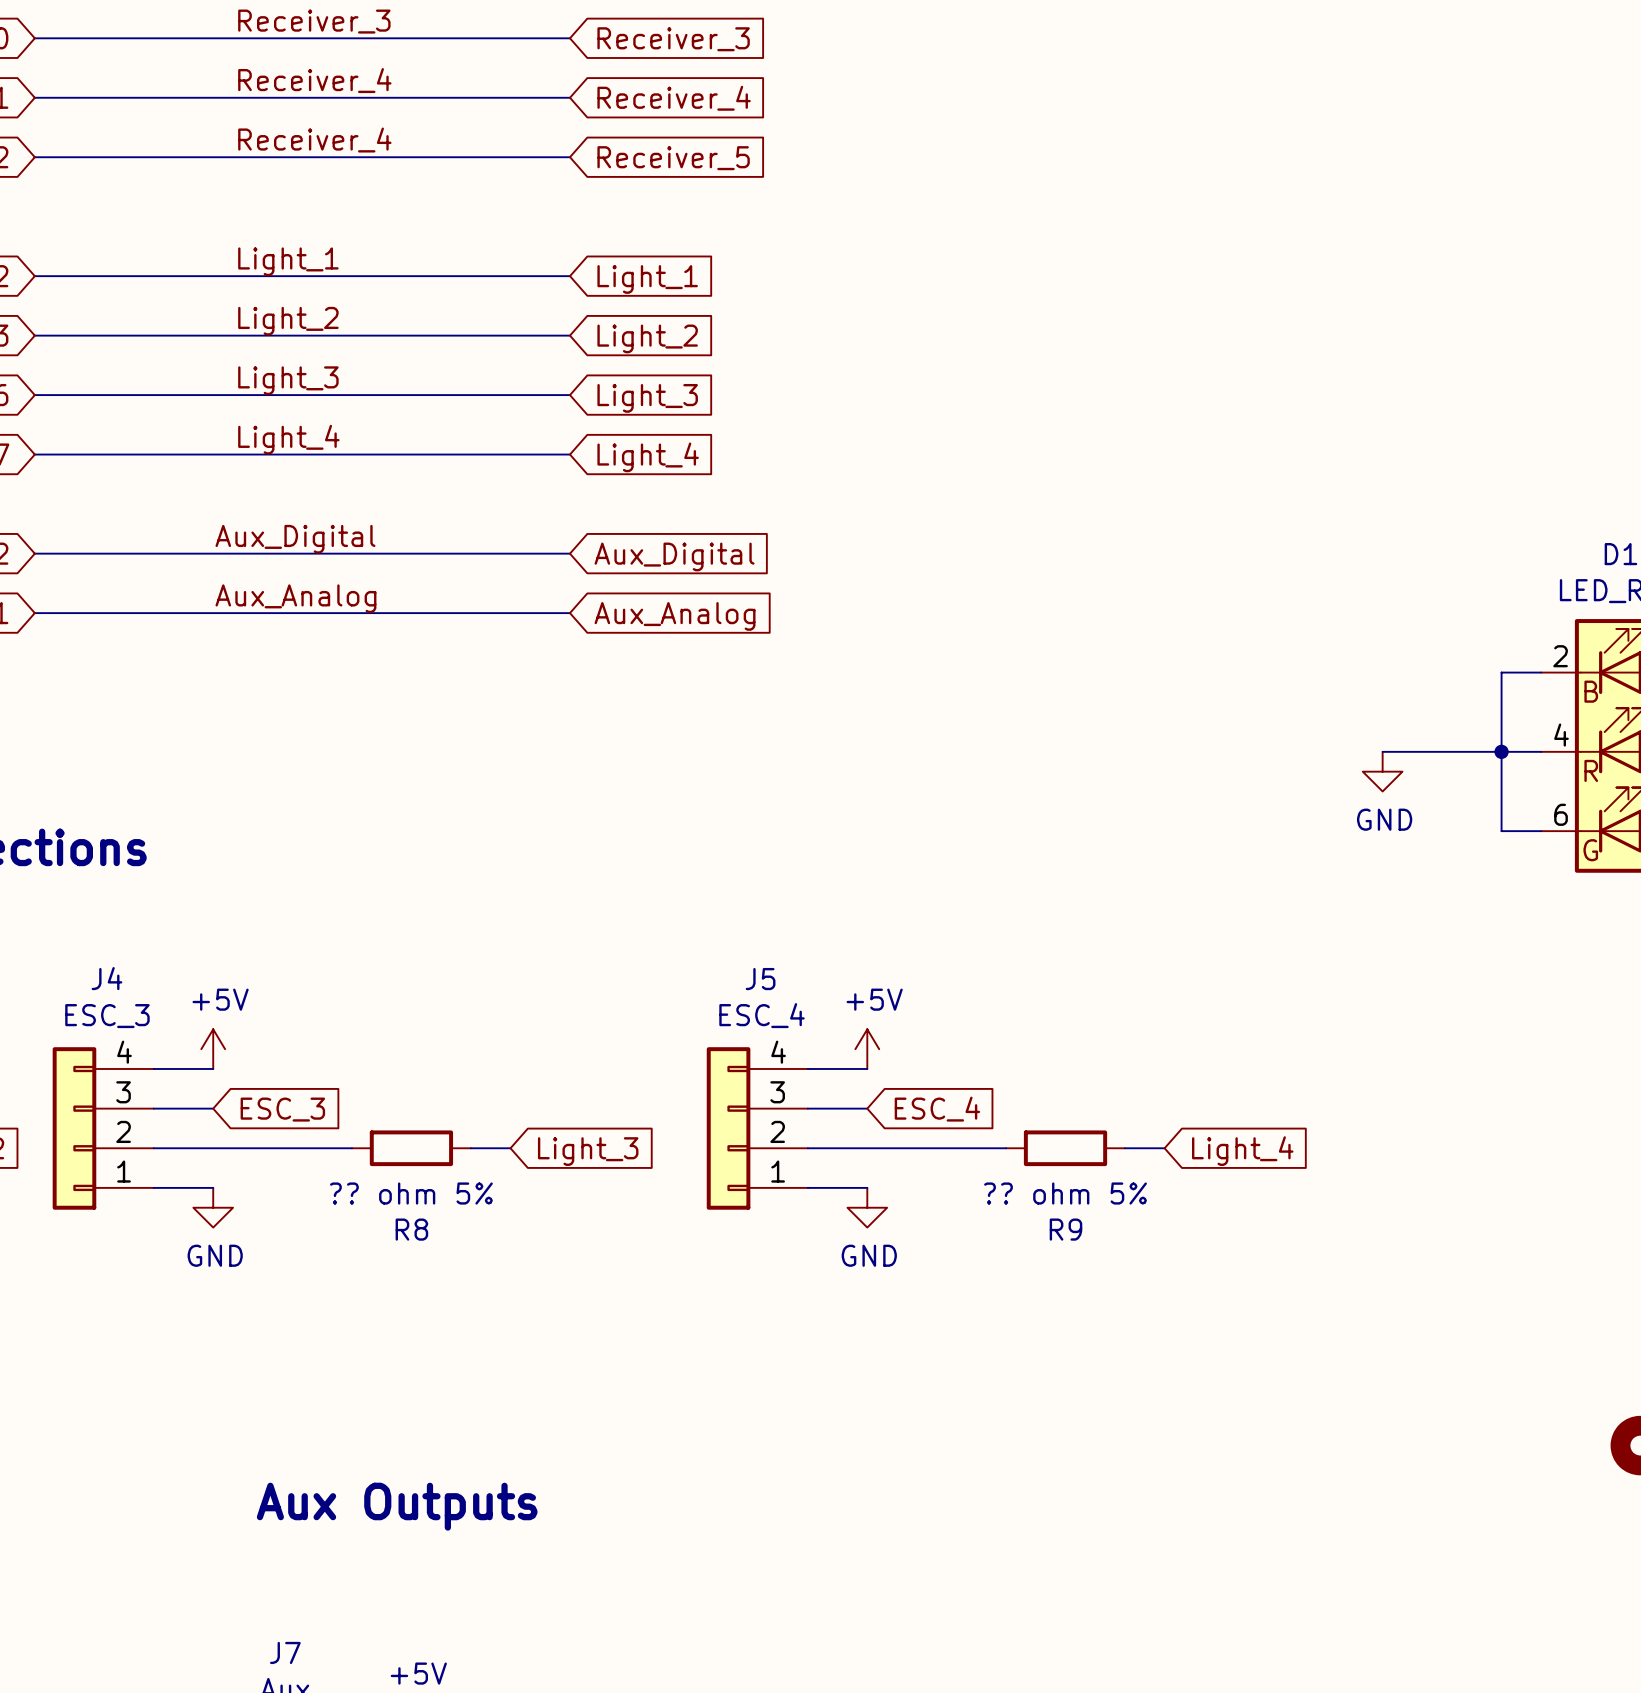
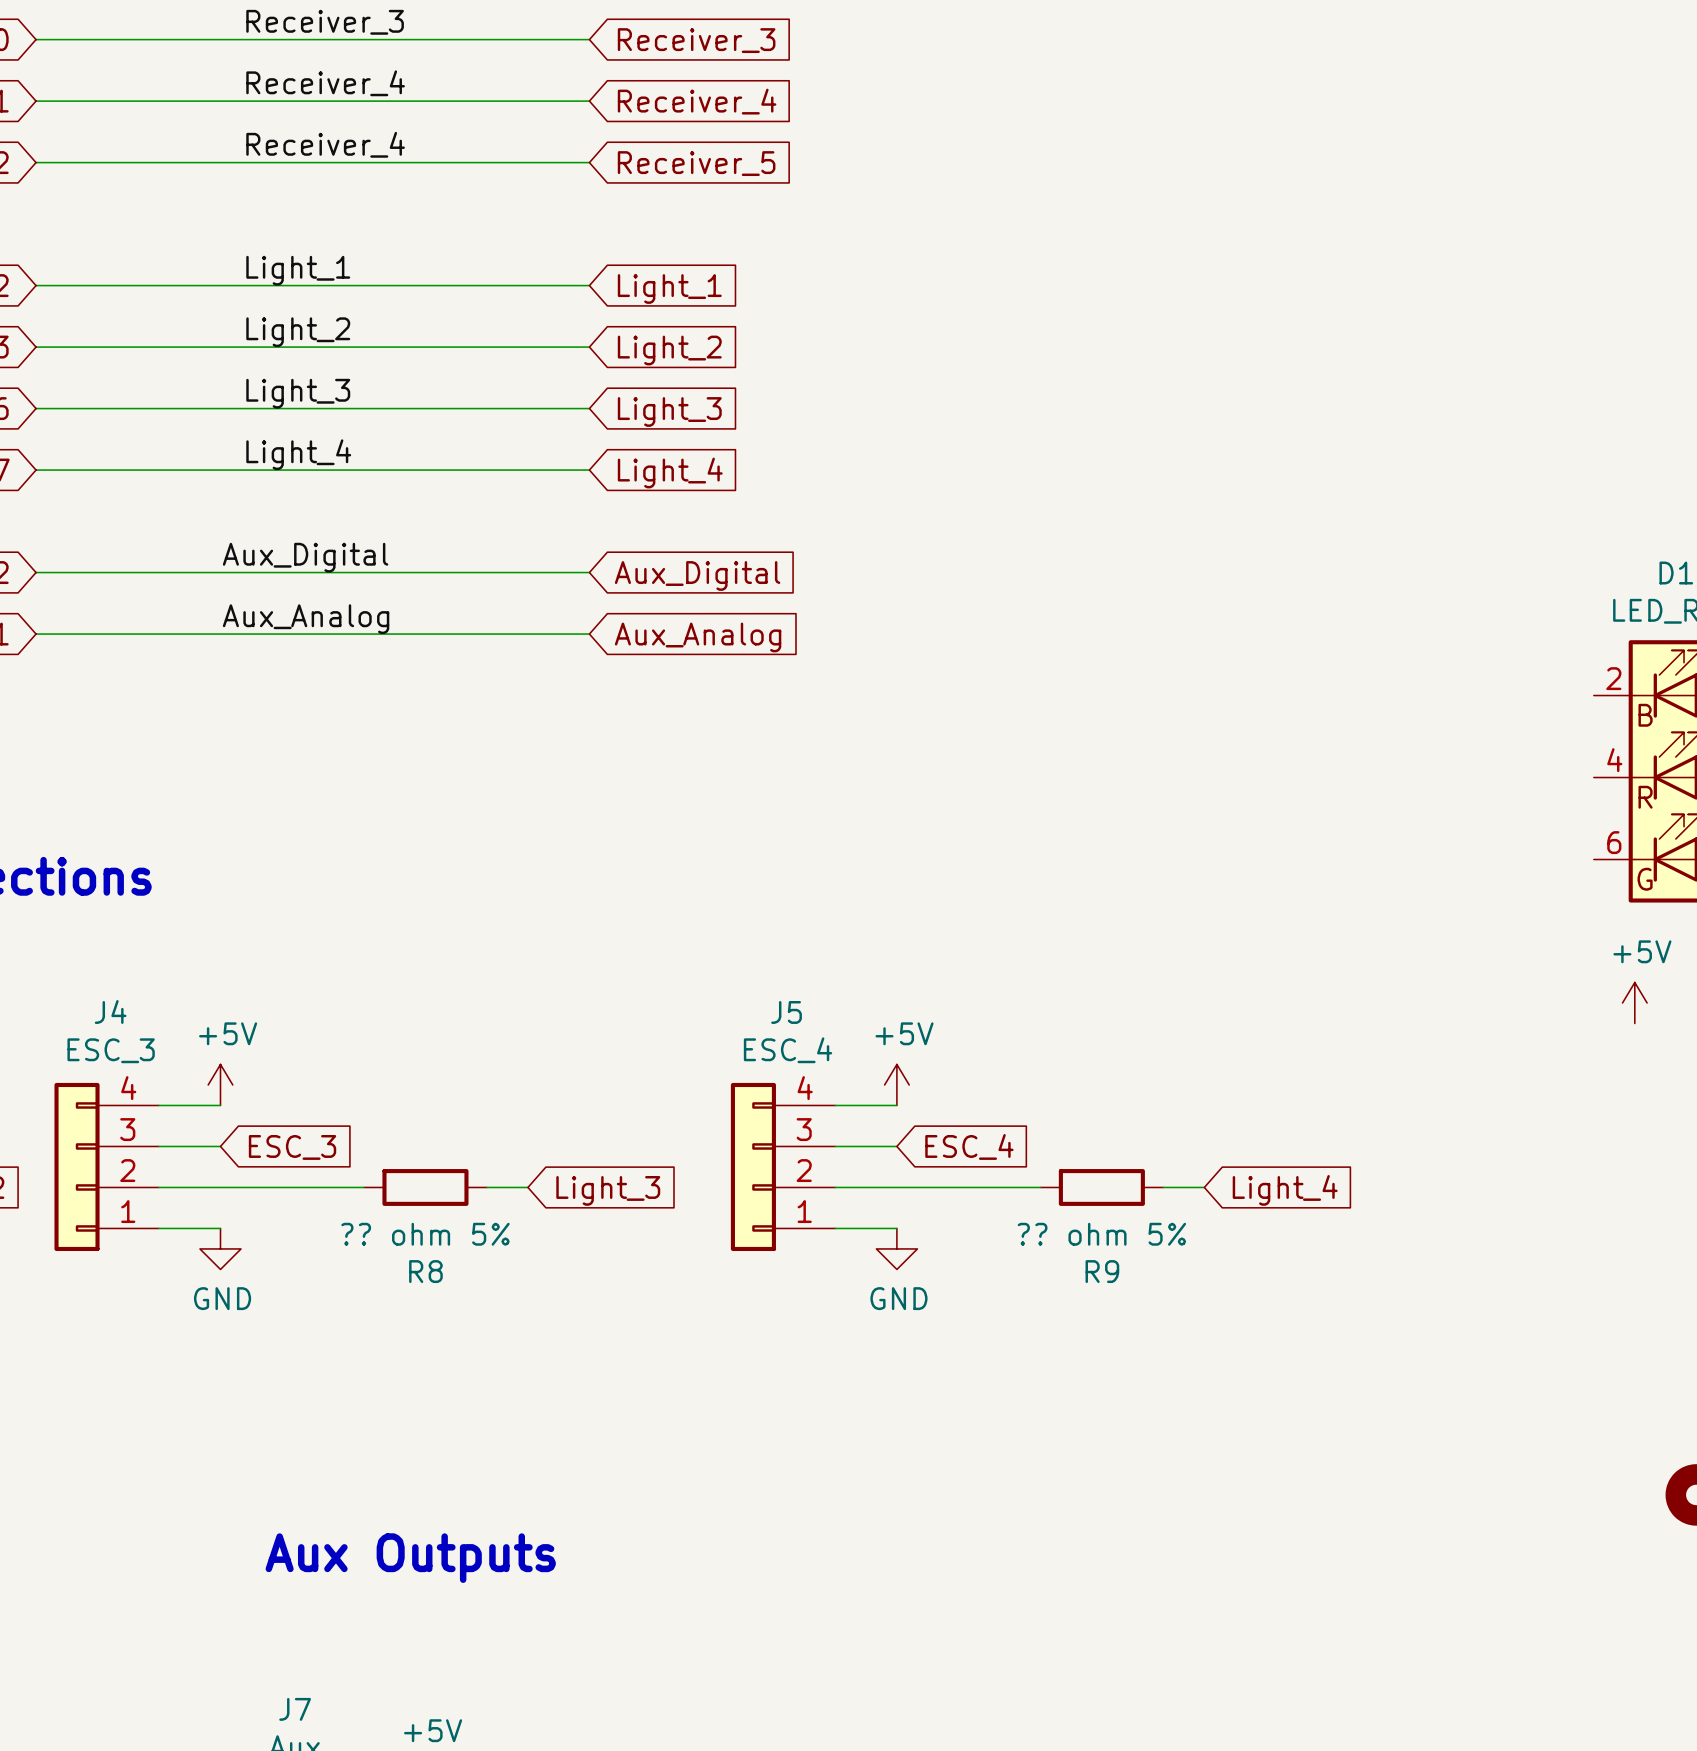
wire: (1541, 672) (1501, 672) (1501, 831) (1541, 831) -> none
wire: (1382, 751) (1541, 751) -> none
junction: (1501, 751) -> none
power symbol: GND (1382, 771) -> none
power symbol: none -> +5V (1634, 1002)

